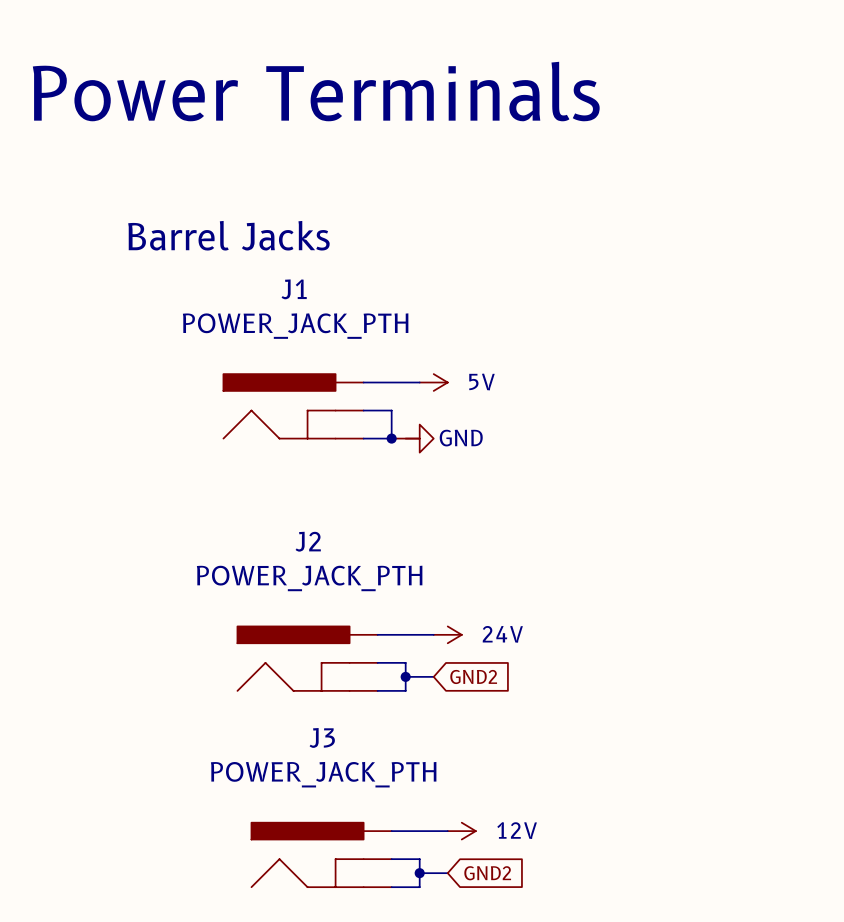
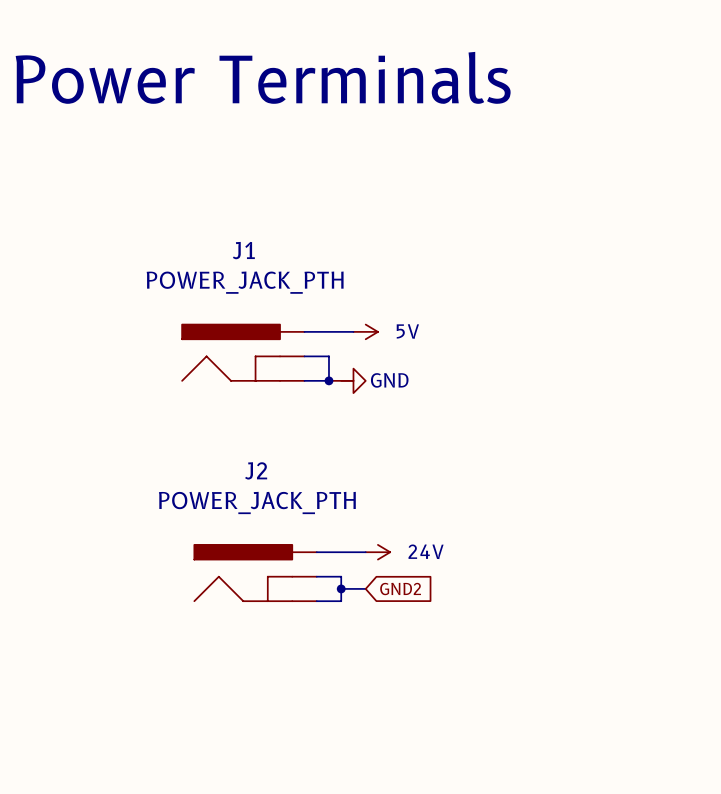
text: Barrel Jacks (228, 235) -> none
wire: (391, 831) (447, 831) -> none
power symbol: 12V (461, 831) -> none
J3: POWER_JACK_PTH (321, 854) -> none
wire: (391, 859) (419, 859) (419, 887) (391, 887) -> none
wire: (419, 873) (447, 873) -> none
junction: (419, 873) -> none
global label: GND2 (487, 873) -> none

